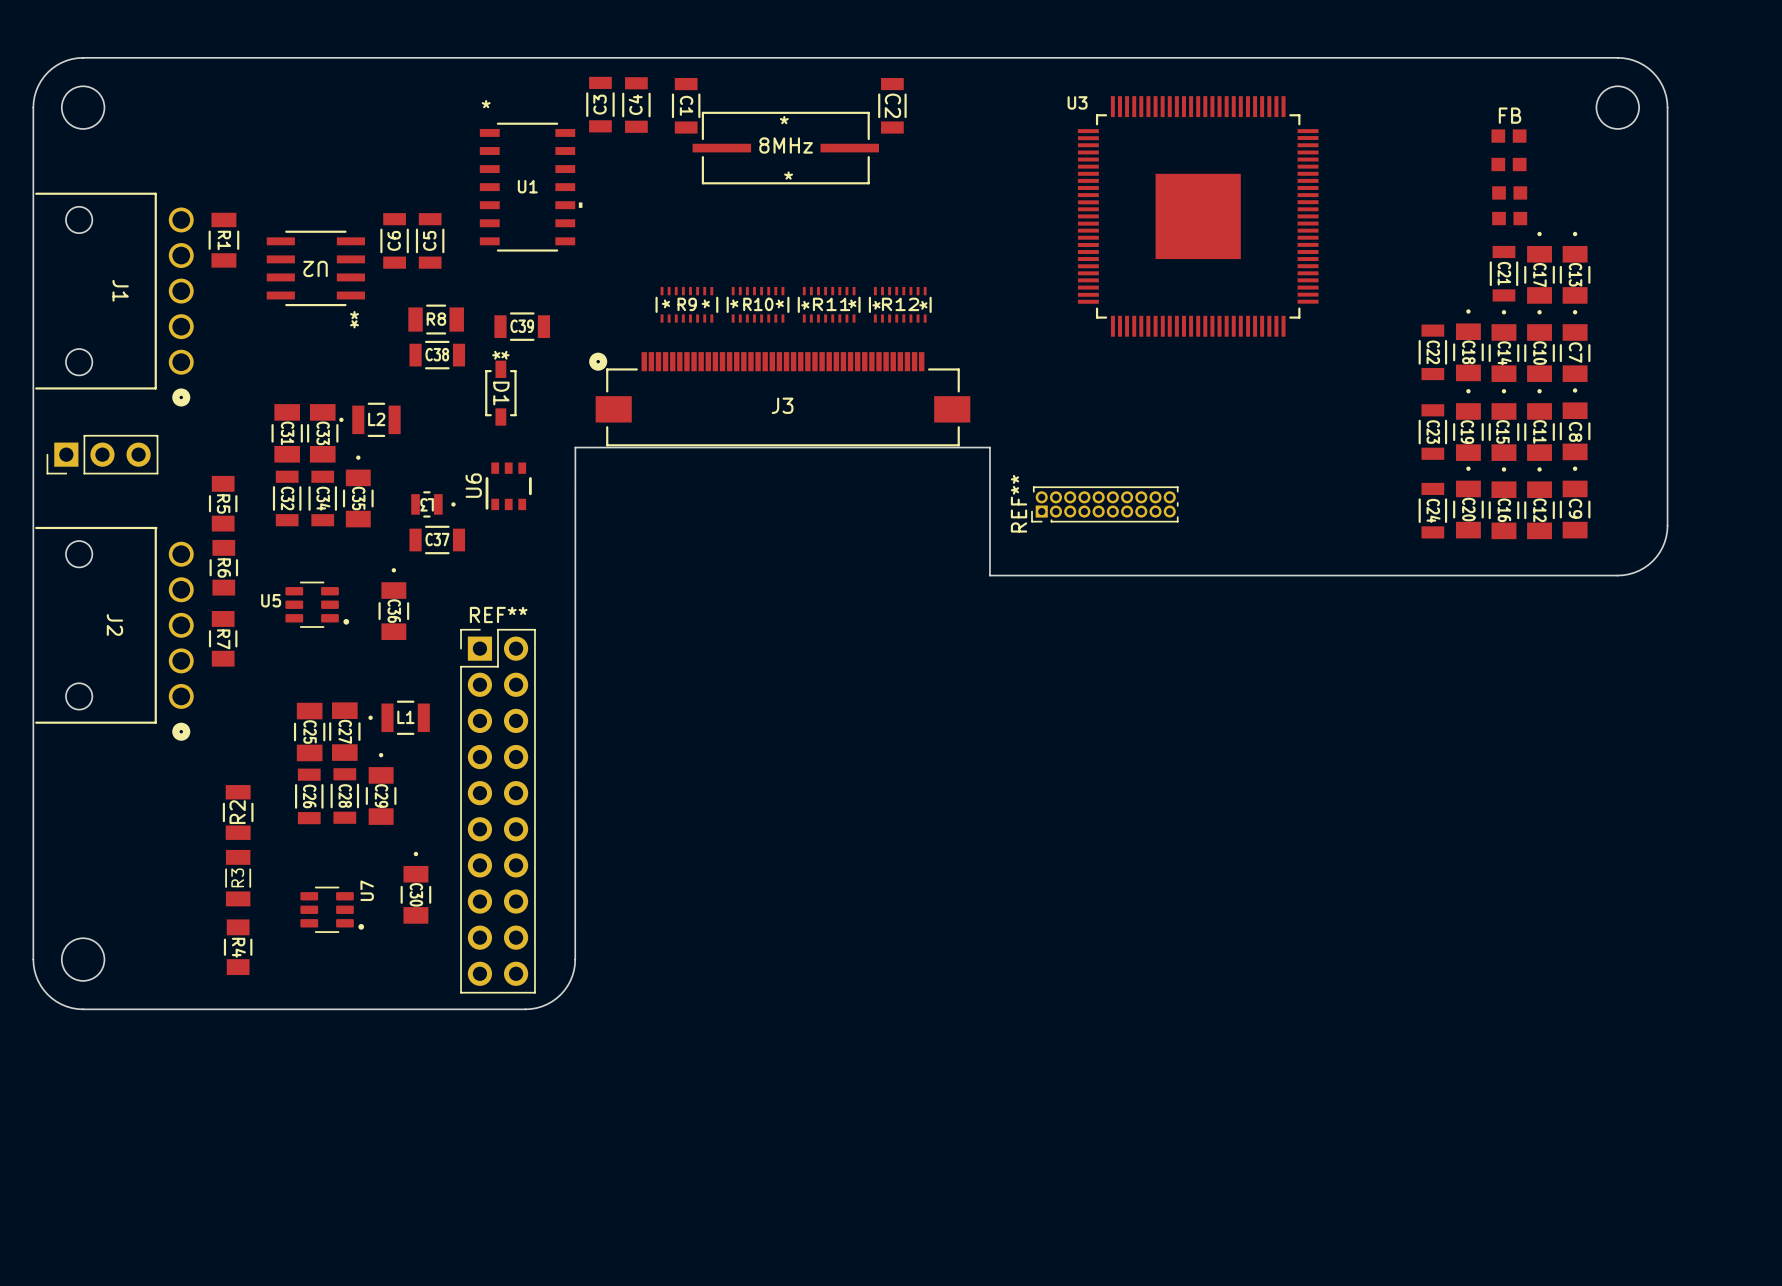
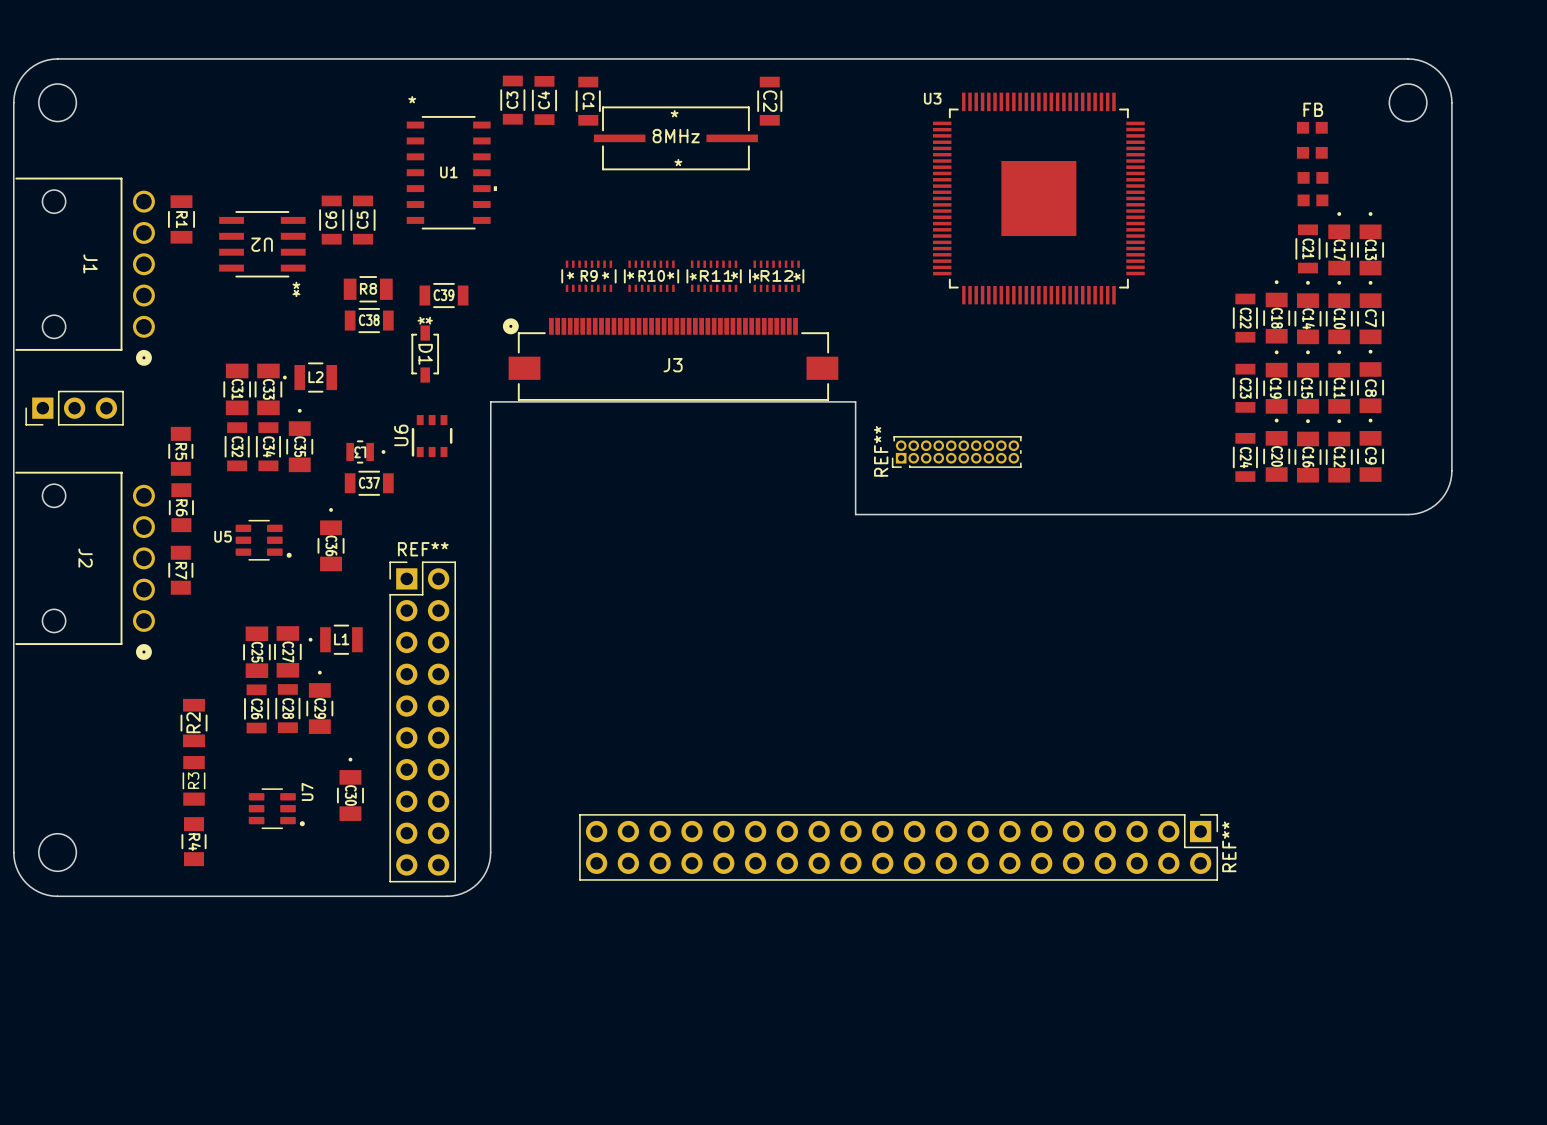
REF**: none -> (898, 847)

